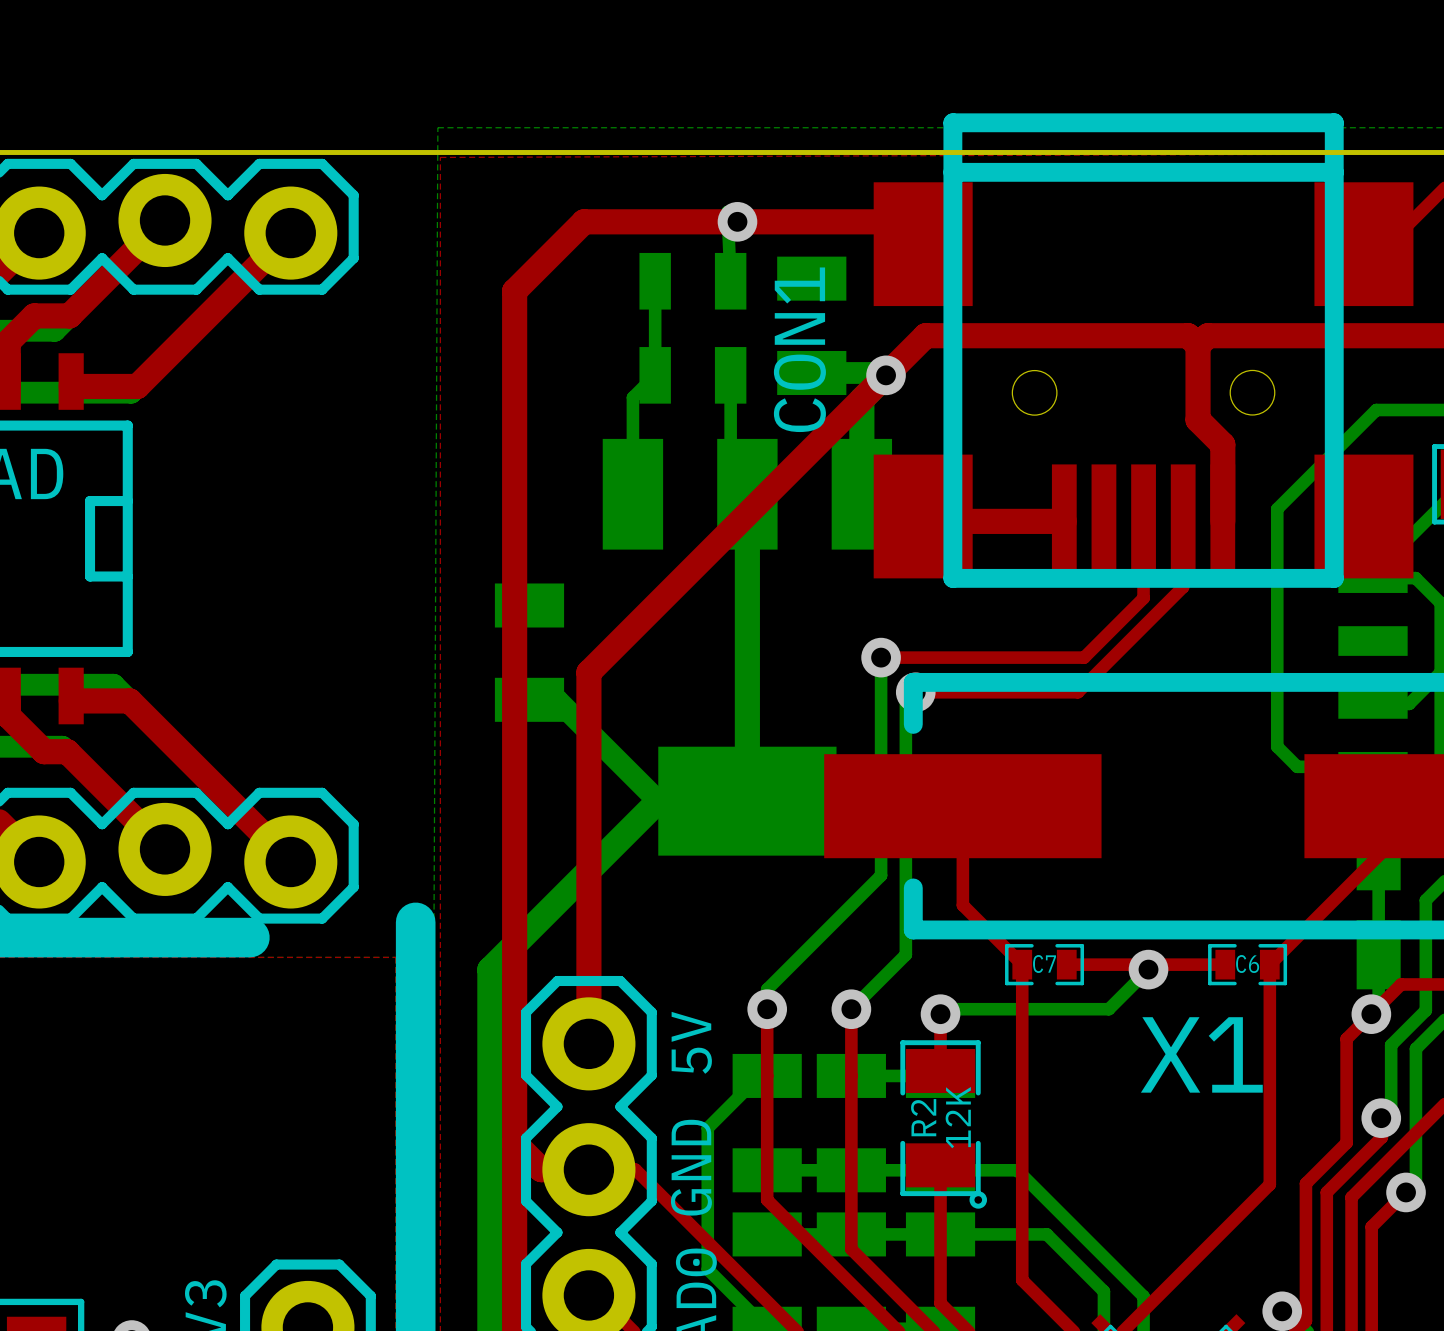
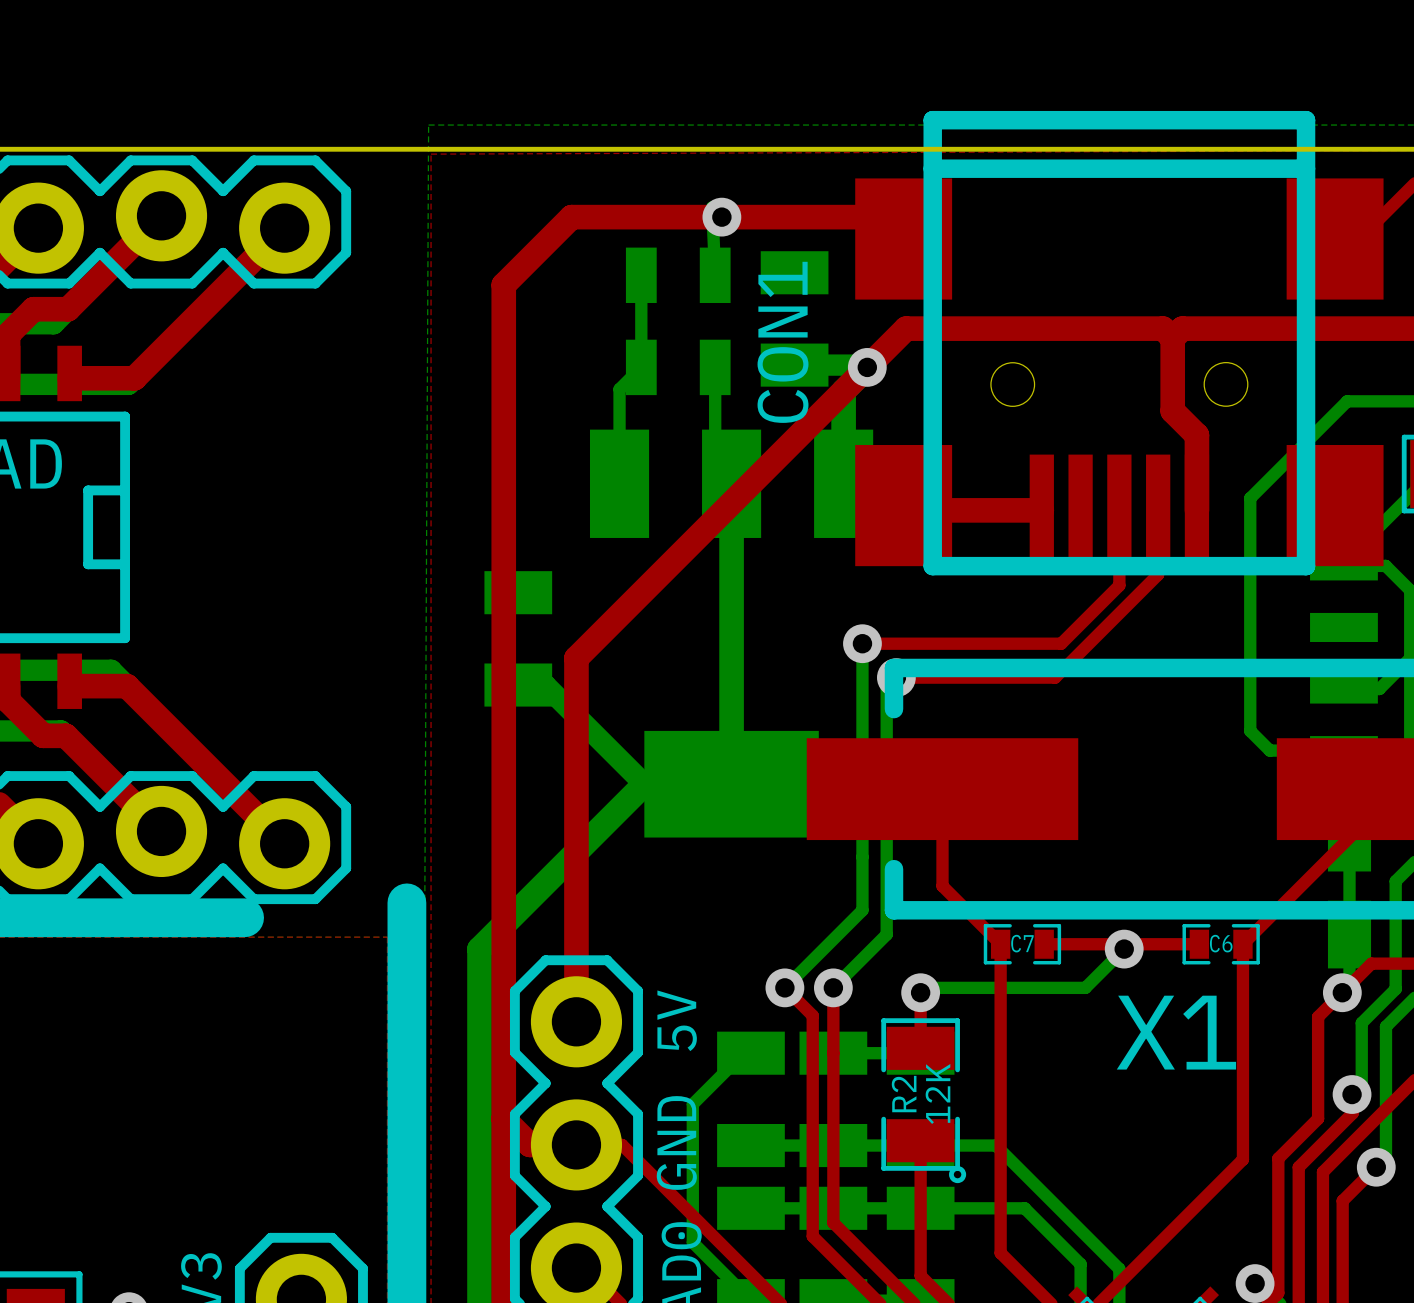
bottom track: (881, 875) (767, 989) (767, 1009) -> (862, 856) (862, 910) (784, 987)
top track: (767, 1009) (767, 1199) (830, 1263) -> (784, 987) (812, 1015) (812, 1236)
via position: (767, 1009) -> (784, 987)

